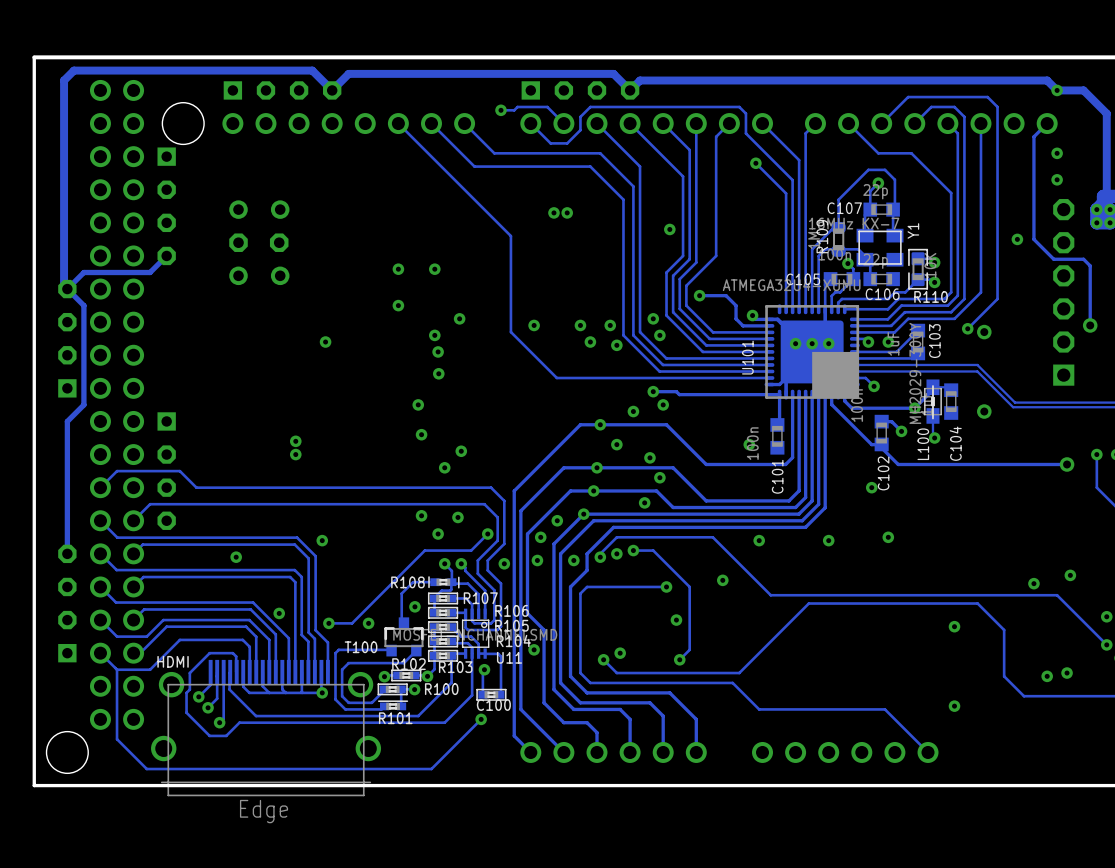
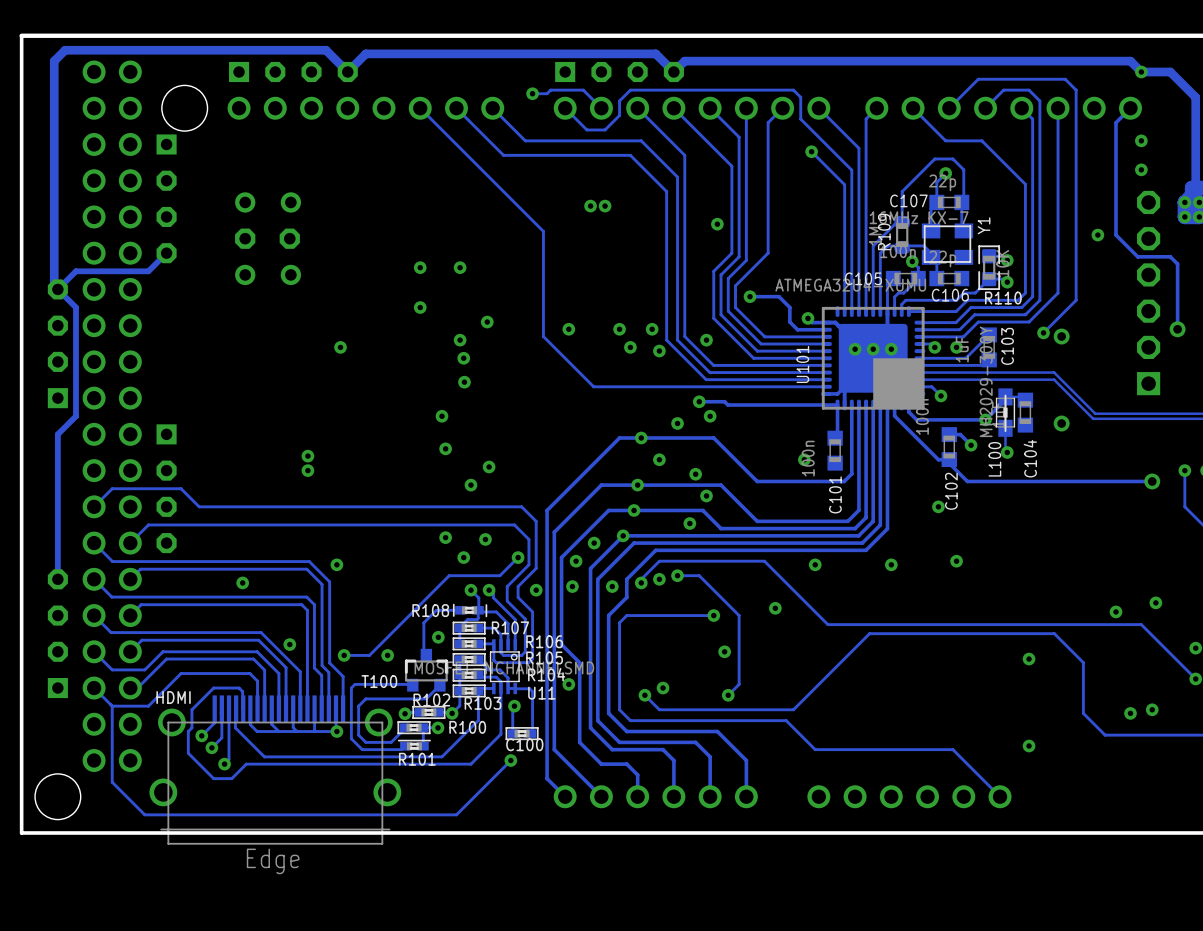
via: (653, 318) -> none

